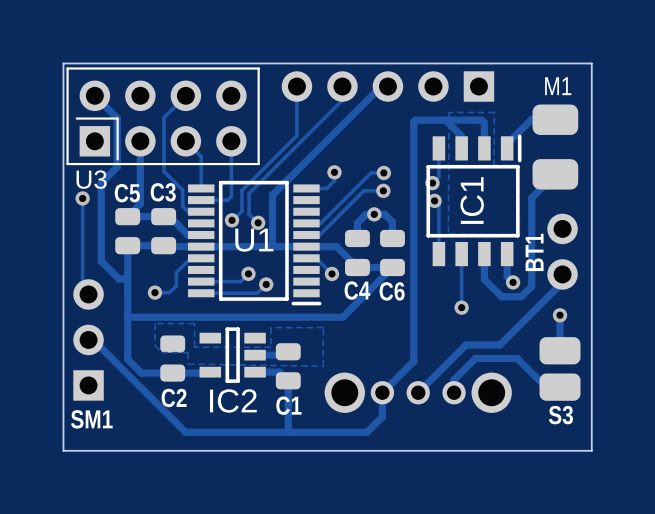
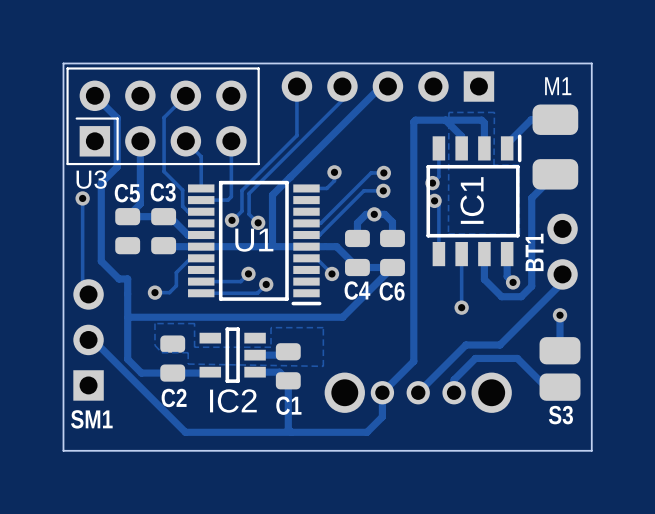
track: (163, 245) (127, 245) (127, 278) -> none

